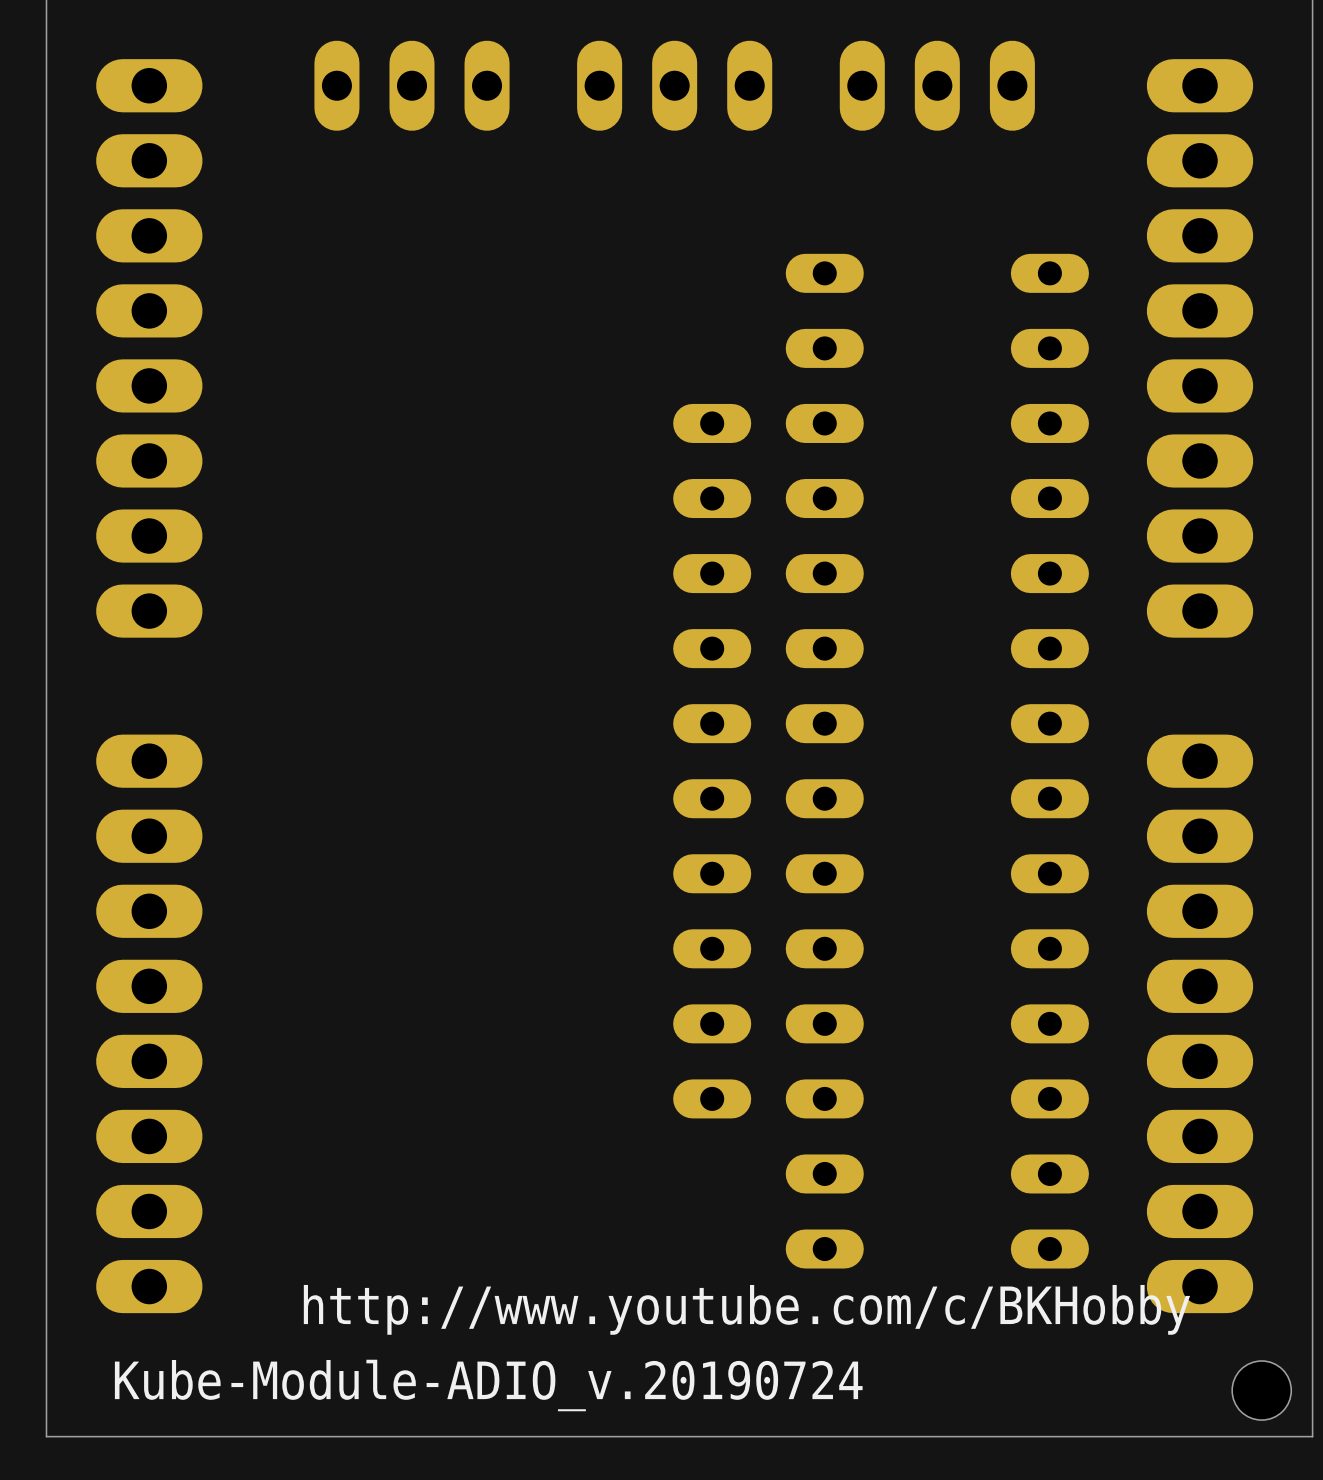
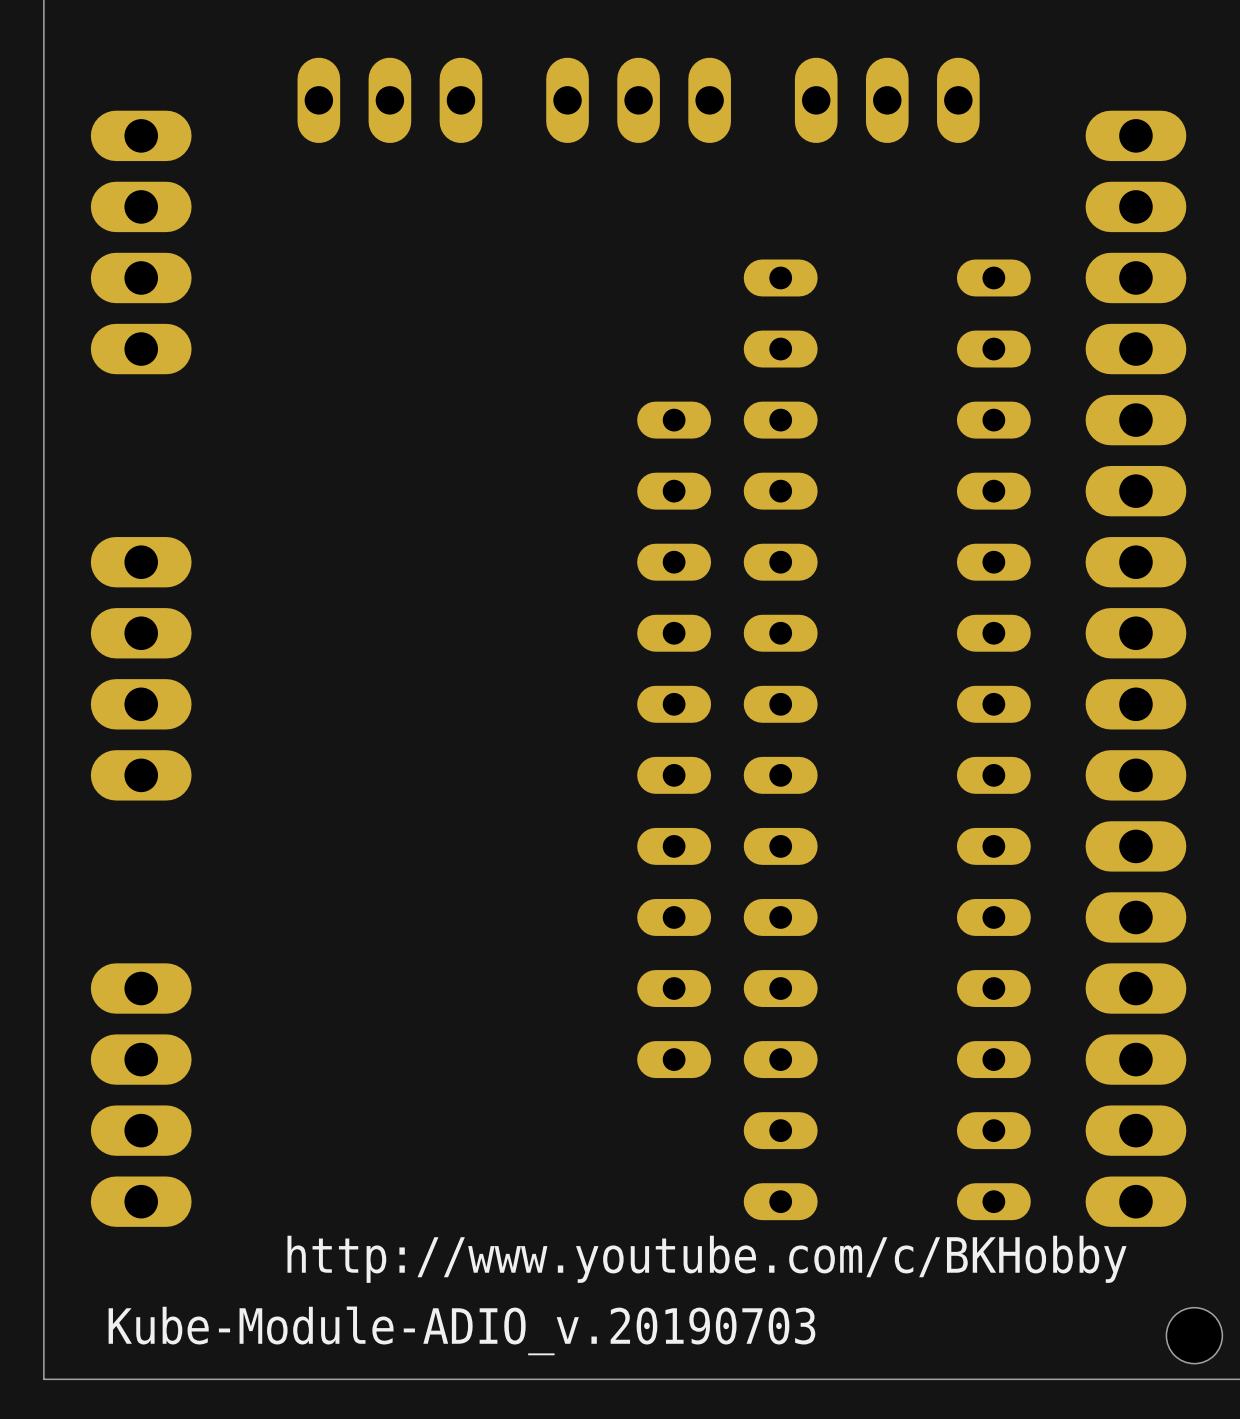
part position: (149, 198) -> (141, 242)
part position: (1200, 198) -> (1135, 242)
part: (149, 498) -> none
part position: (1200, 498) -> (1135, 526)
part: none -> (141, 668)
part: (149, 873) -> none
part position: (1200, 873) -> (1135, 810)
part position: (149, 1173) -> (141, 1095)
part position: (1200, 1173) -> (1135, 1095)
text: Kube-Module-ADIO_v.20190724 (488, 1385) -> Kube-Module-ADIO_v.20190703 (461, 1330)

